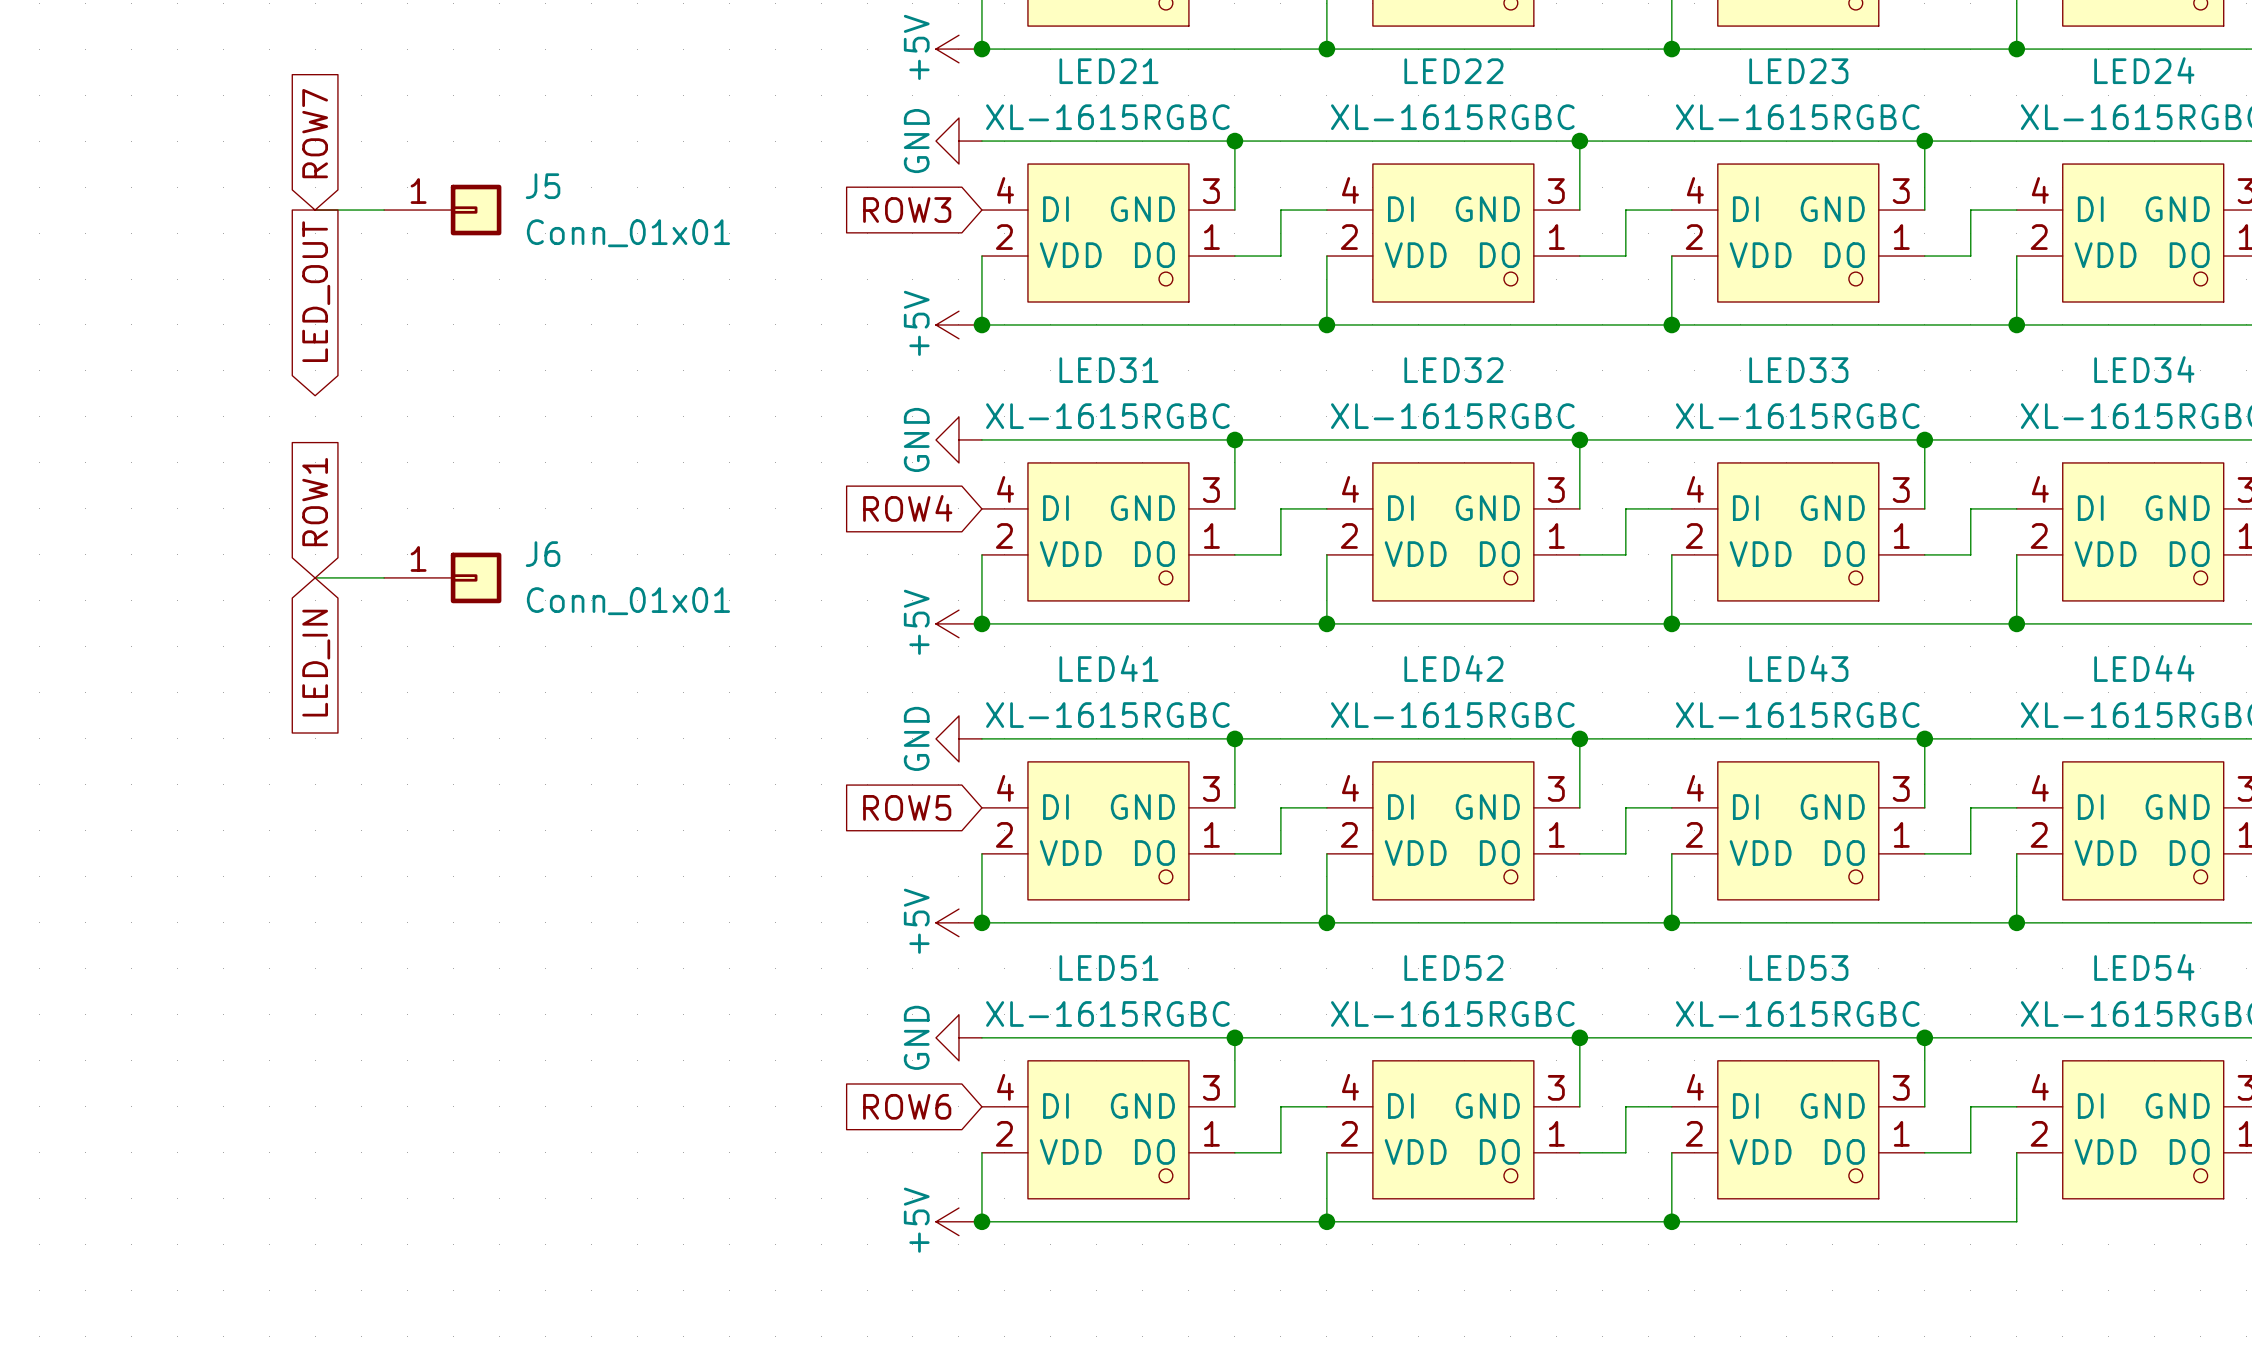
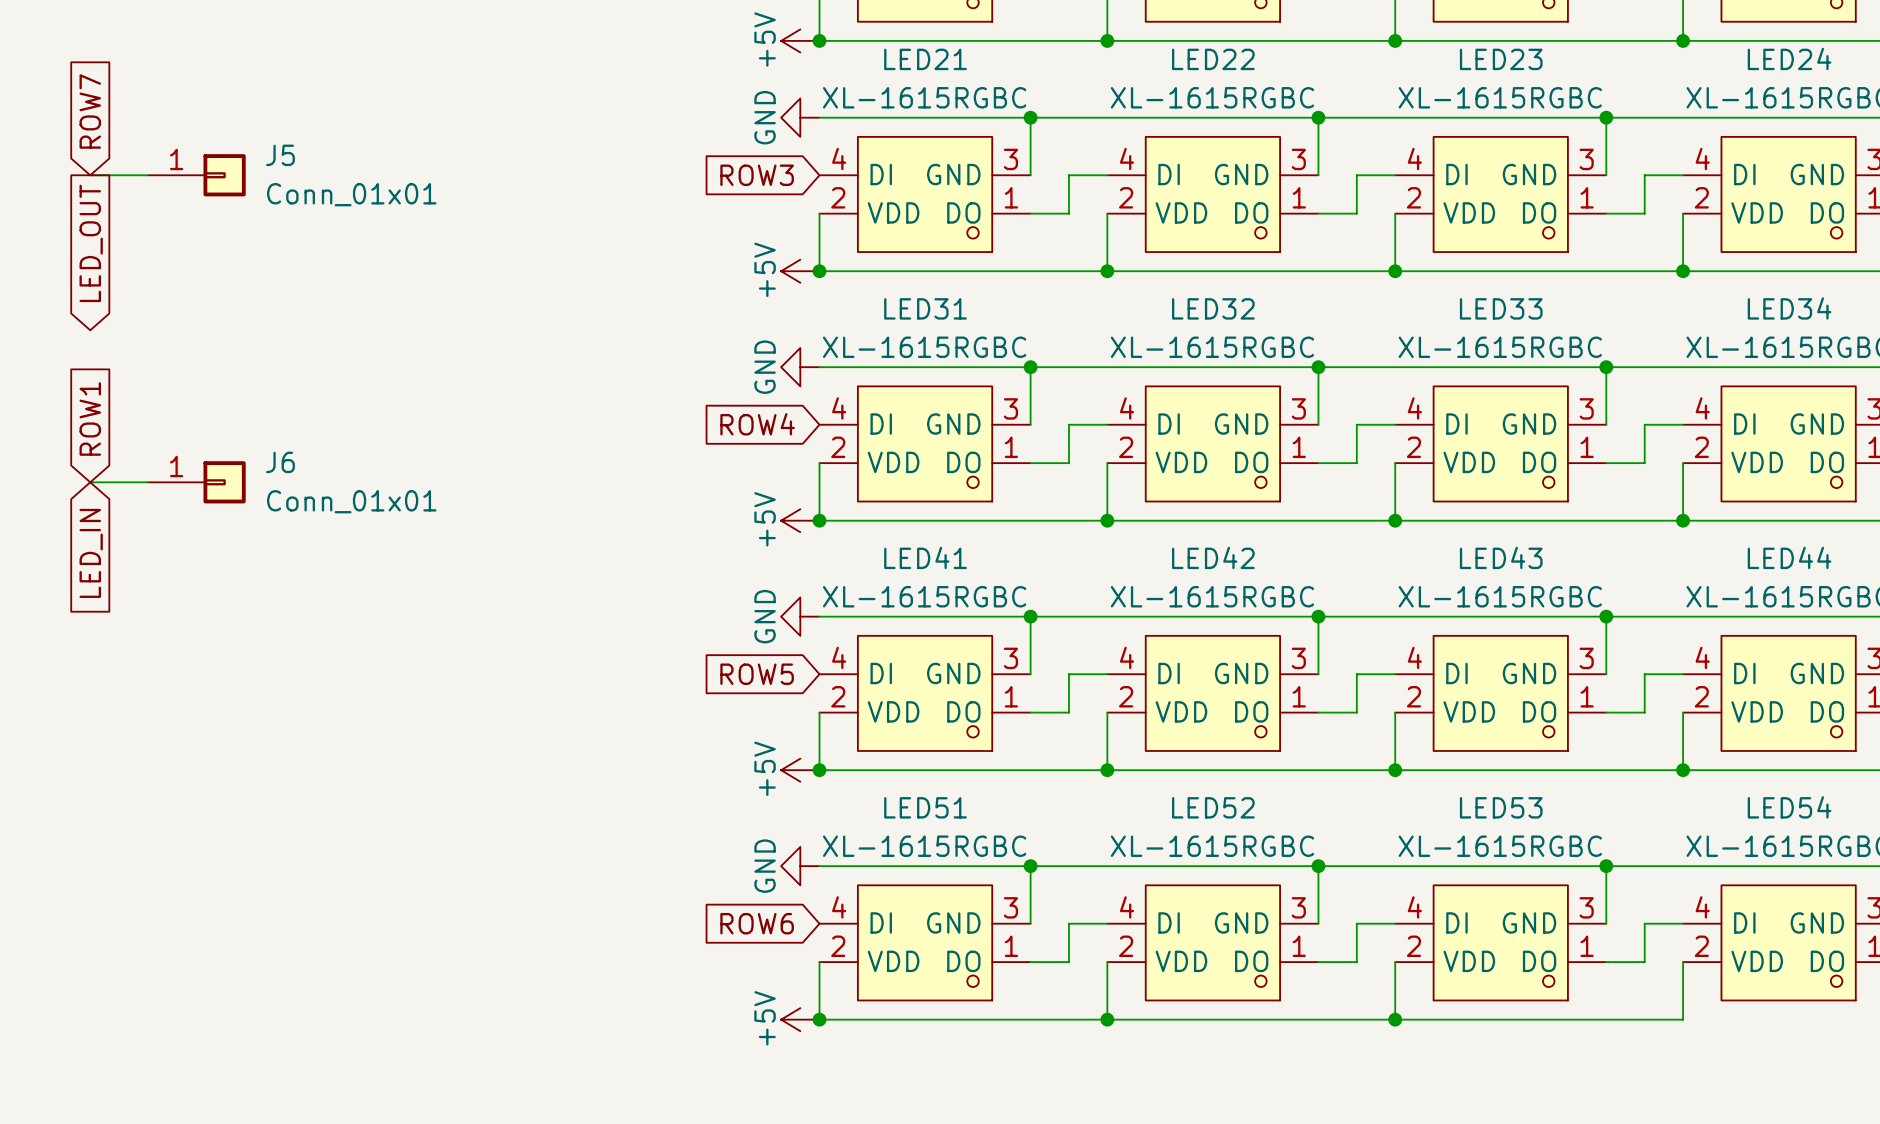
global label position: ROW7 (315, 133) -> ROW7 (90, 111)
wire: (315, 210) (384, 210) -> (90, 175) (147, 175)
J5 position: (442, 210) -> (196, 175)
global label position: LED_OUT (316, 291) -> LED_OUT (91, 243)
global label position: ROW1 (315, 502) -> ROW1 (90, 419)
wire: (315, 577) (384, 577) -> (90, 482) (147, 482)
J6 position: (442, 577) -> (196, 482)
global label position: LED_IN (316, 663) -> LED_IN (91, 553)

